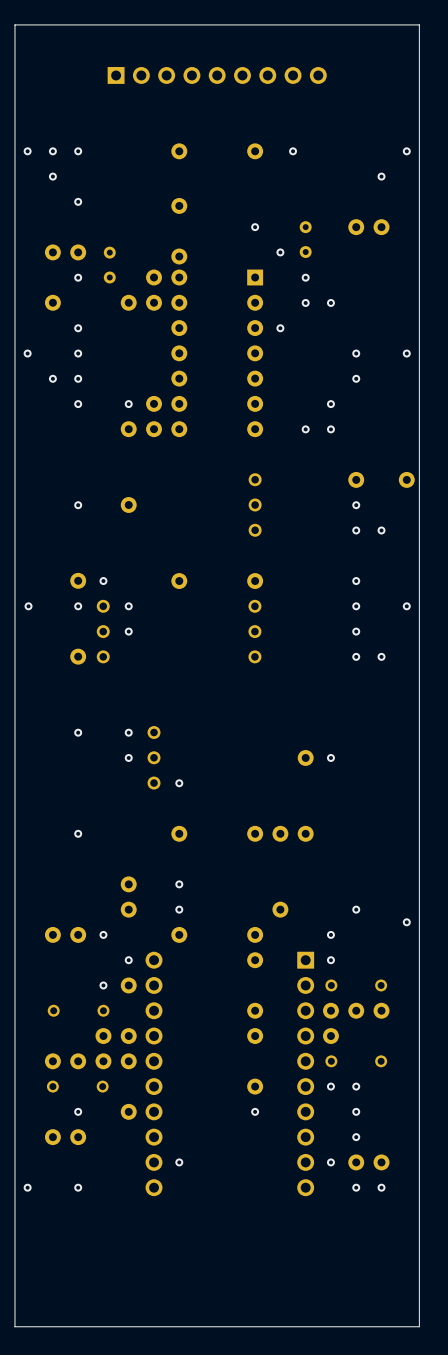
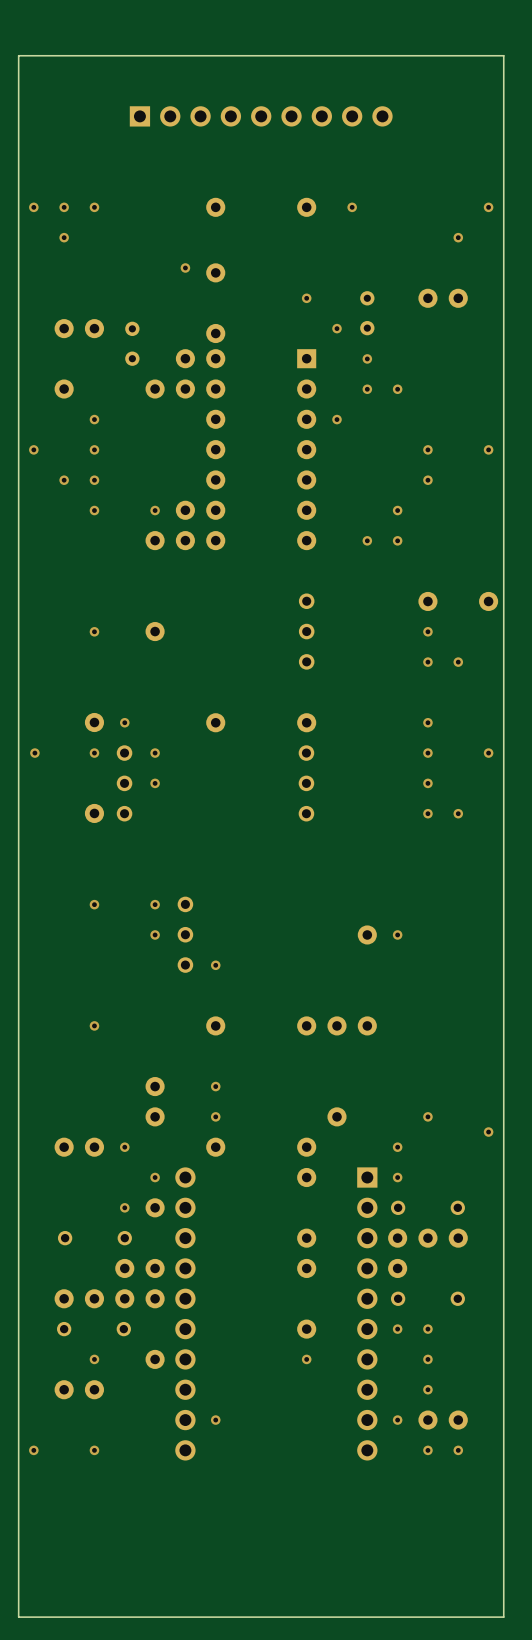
via: (78, 201) -> none
via: none -> (185, 267)
via: (78, 277) -> none

